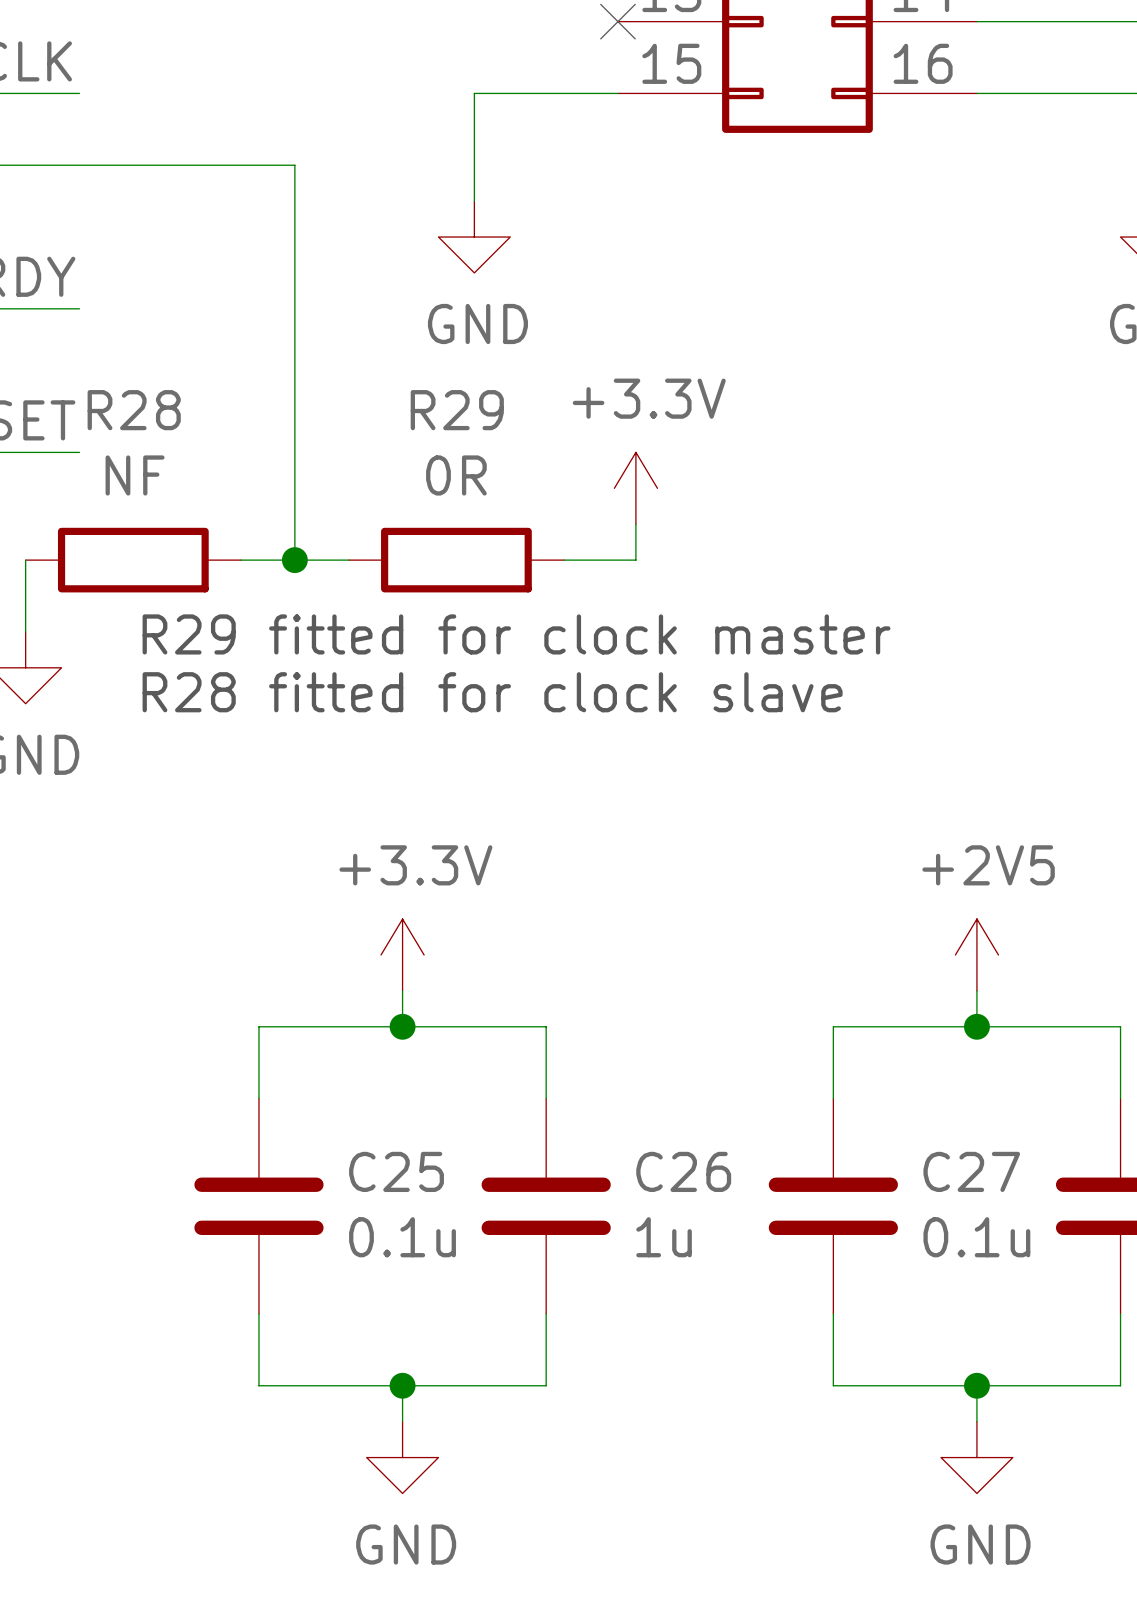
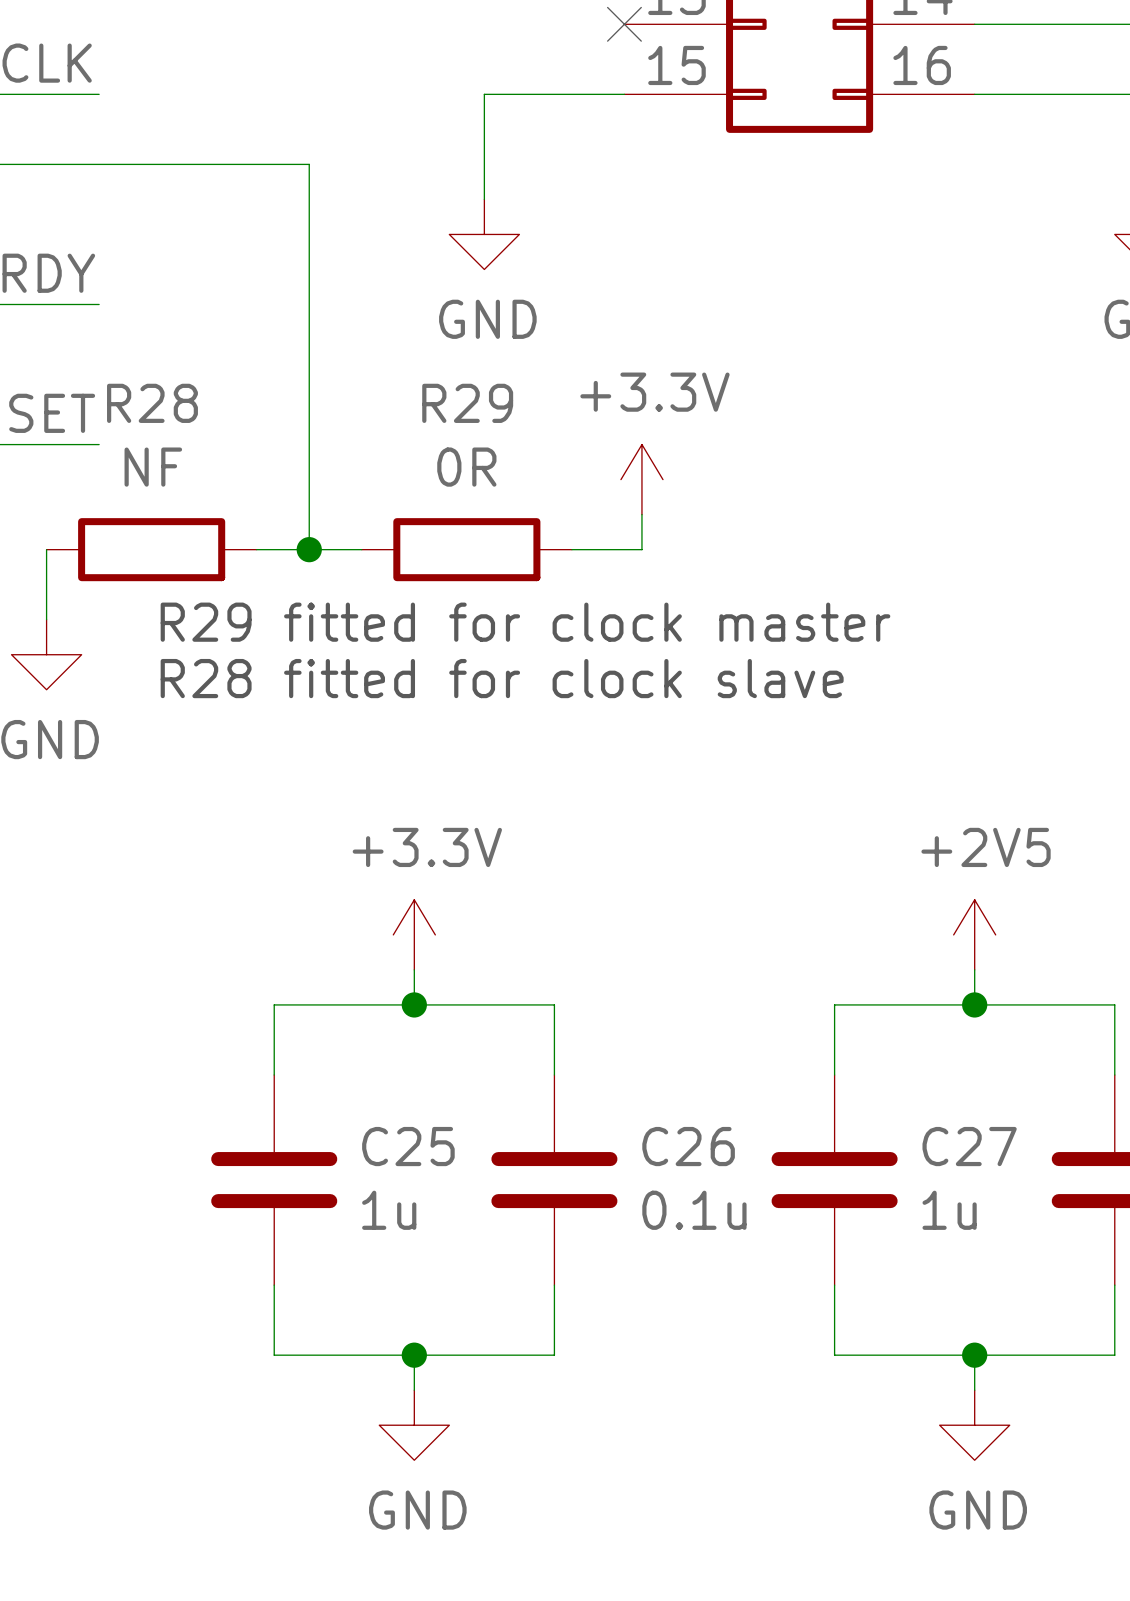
C25 value: 0.1u (402, 1237) -> 1u (389, 1210)
C26 value: 1u (664, 1237) -> 0.1u (694, 1210)
C27 value: 0.1u (976, 1237) -> 1u (949, 1210)

